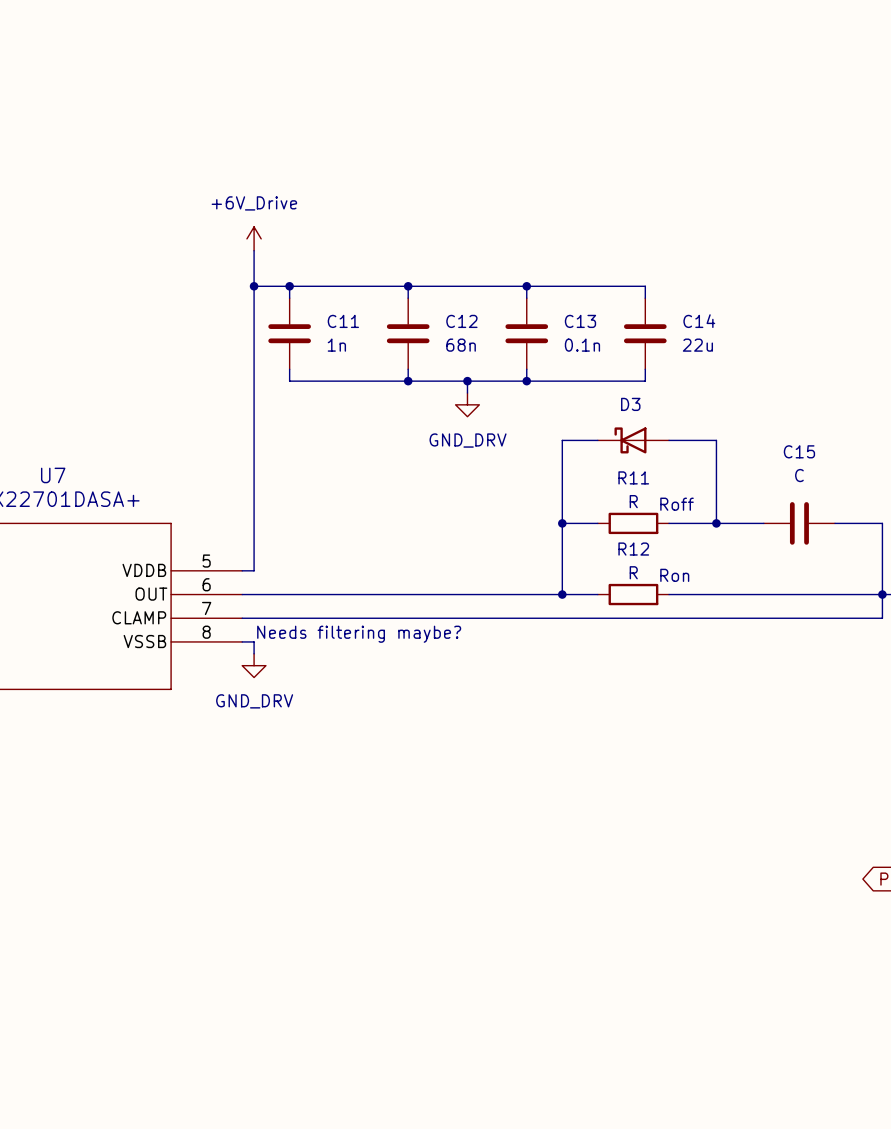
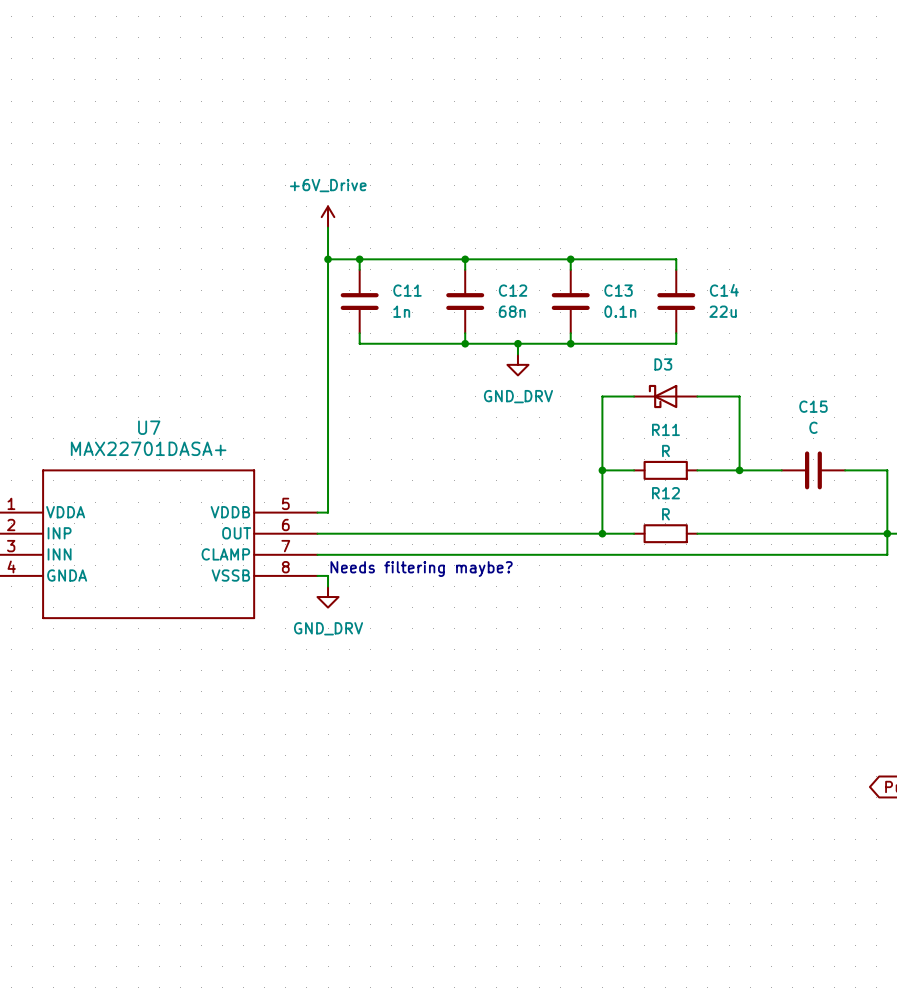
text: Roff (677, 504) -> none
text: Ron (674, 575) -> none

